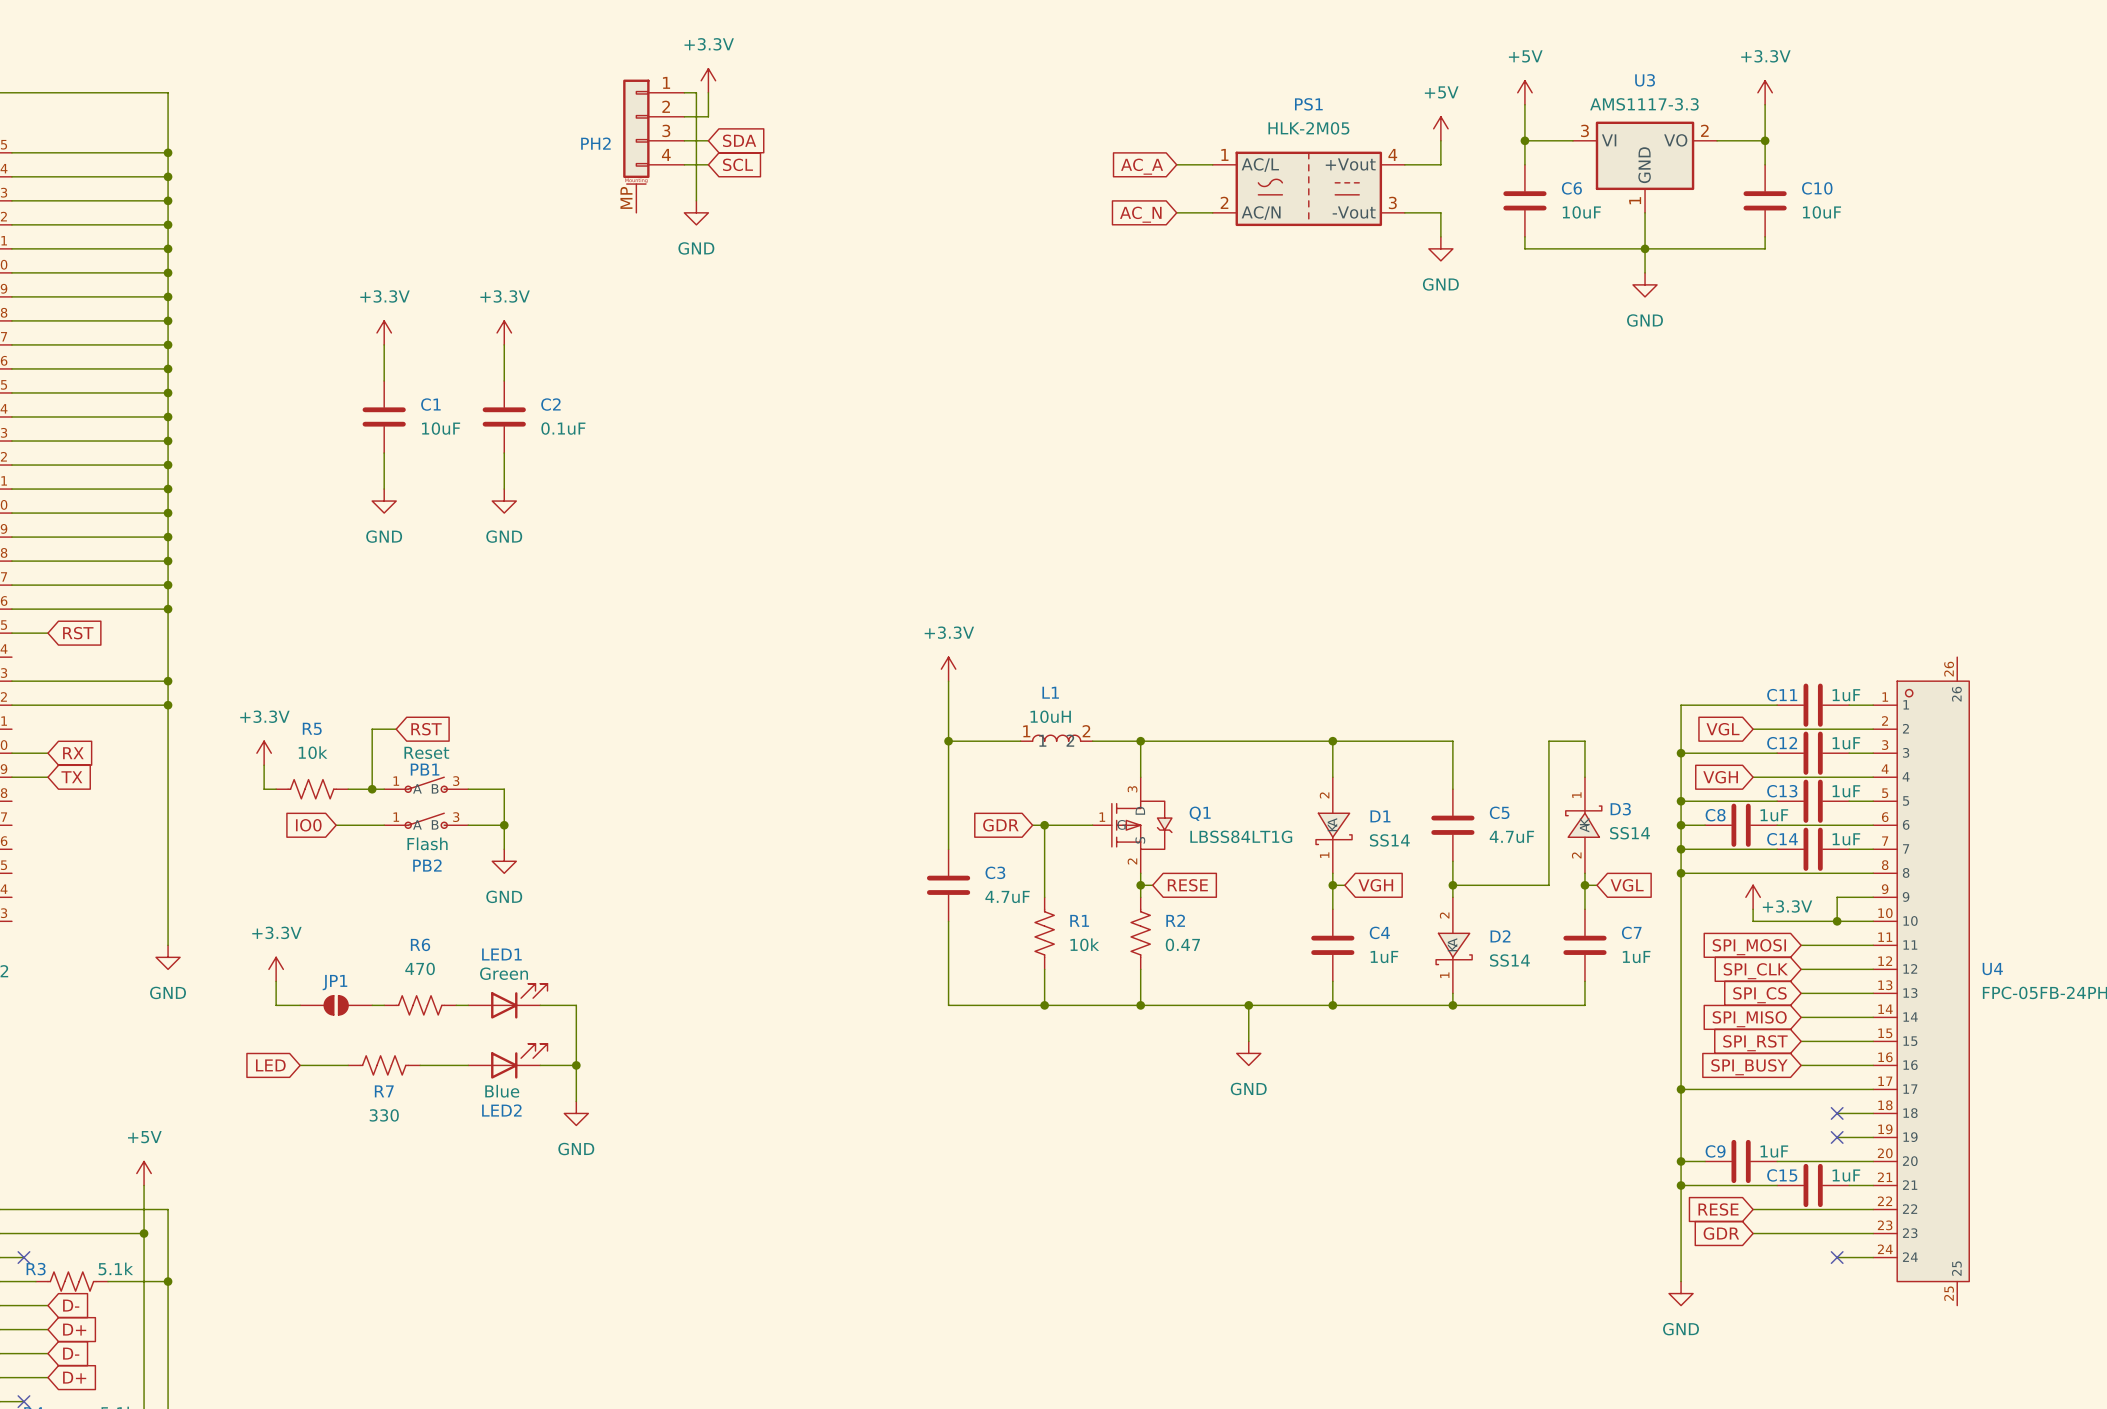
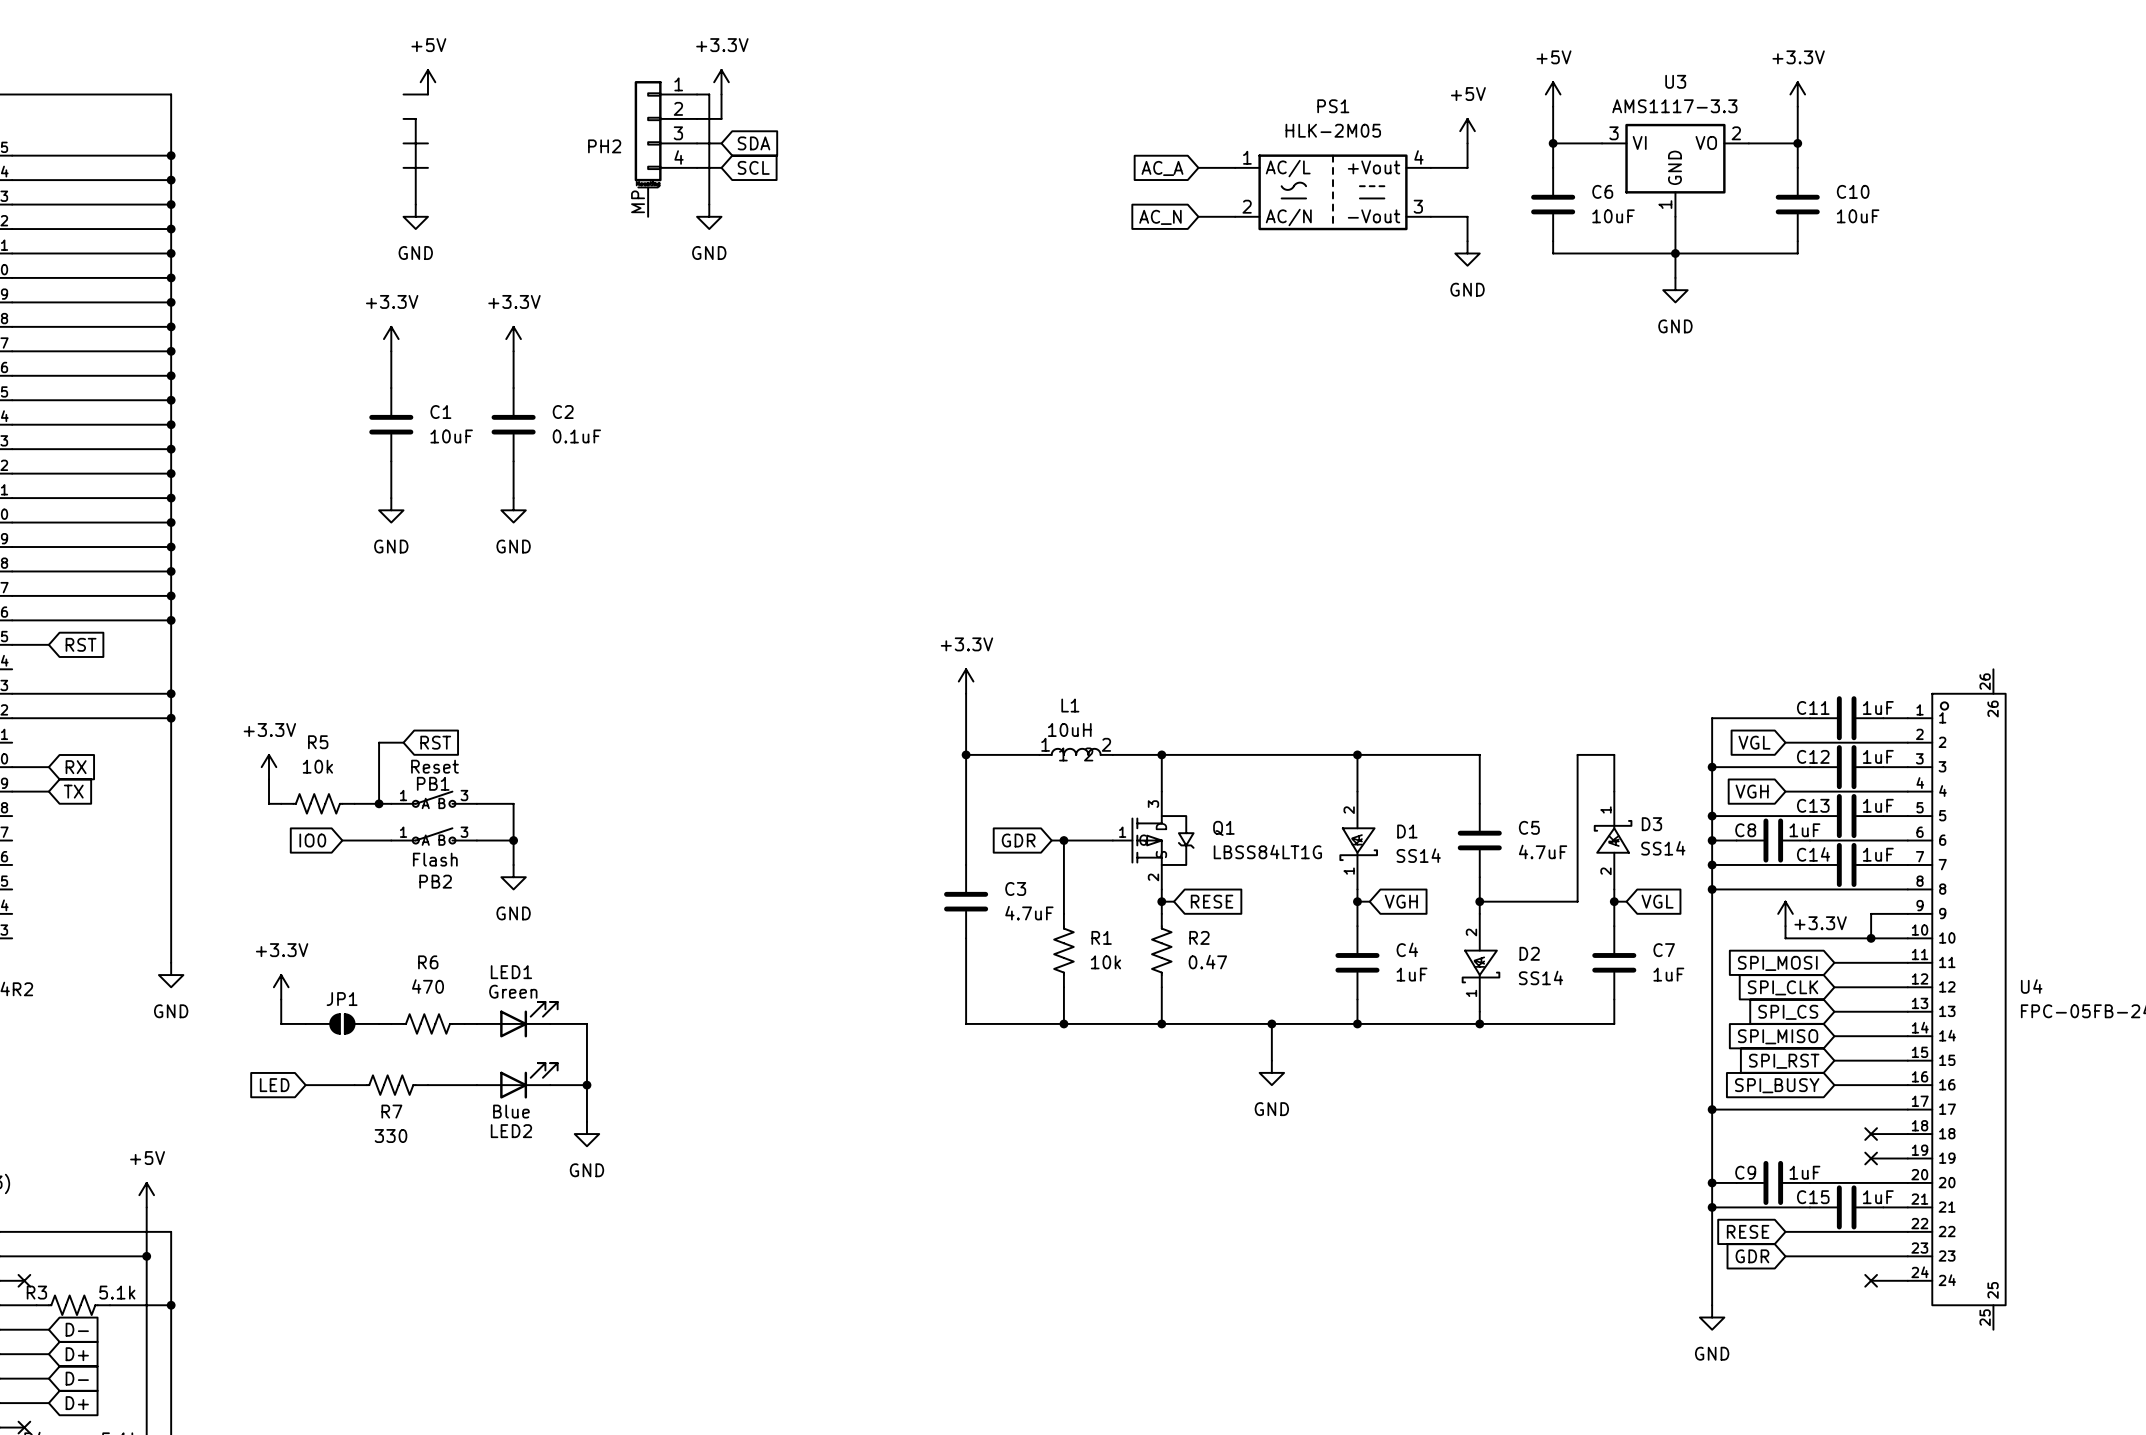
power symbol: none -> +5V (427, 82)
wire: none -> (403, 94) (427, 94)
wire: none -> (403, 118) (415, 118) (415, 204)
wire: none -> (403, 143) (427, 143)
wire: none -> (403, 167) (427, 167)
power symbol: none -> GND (415, 216)

